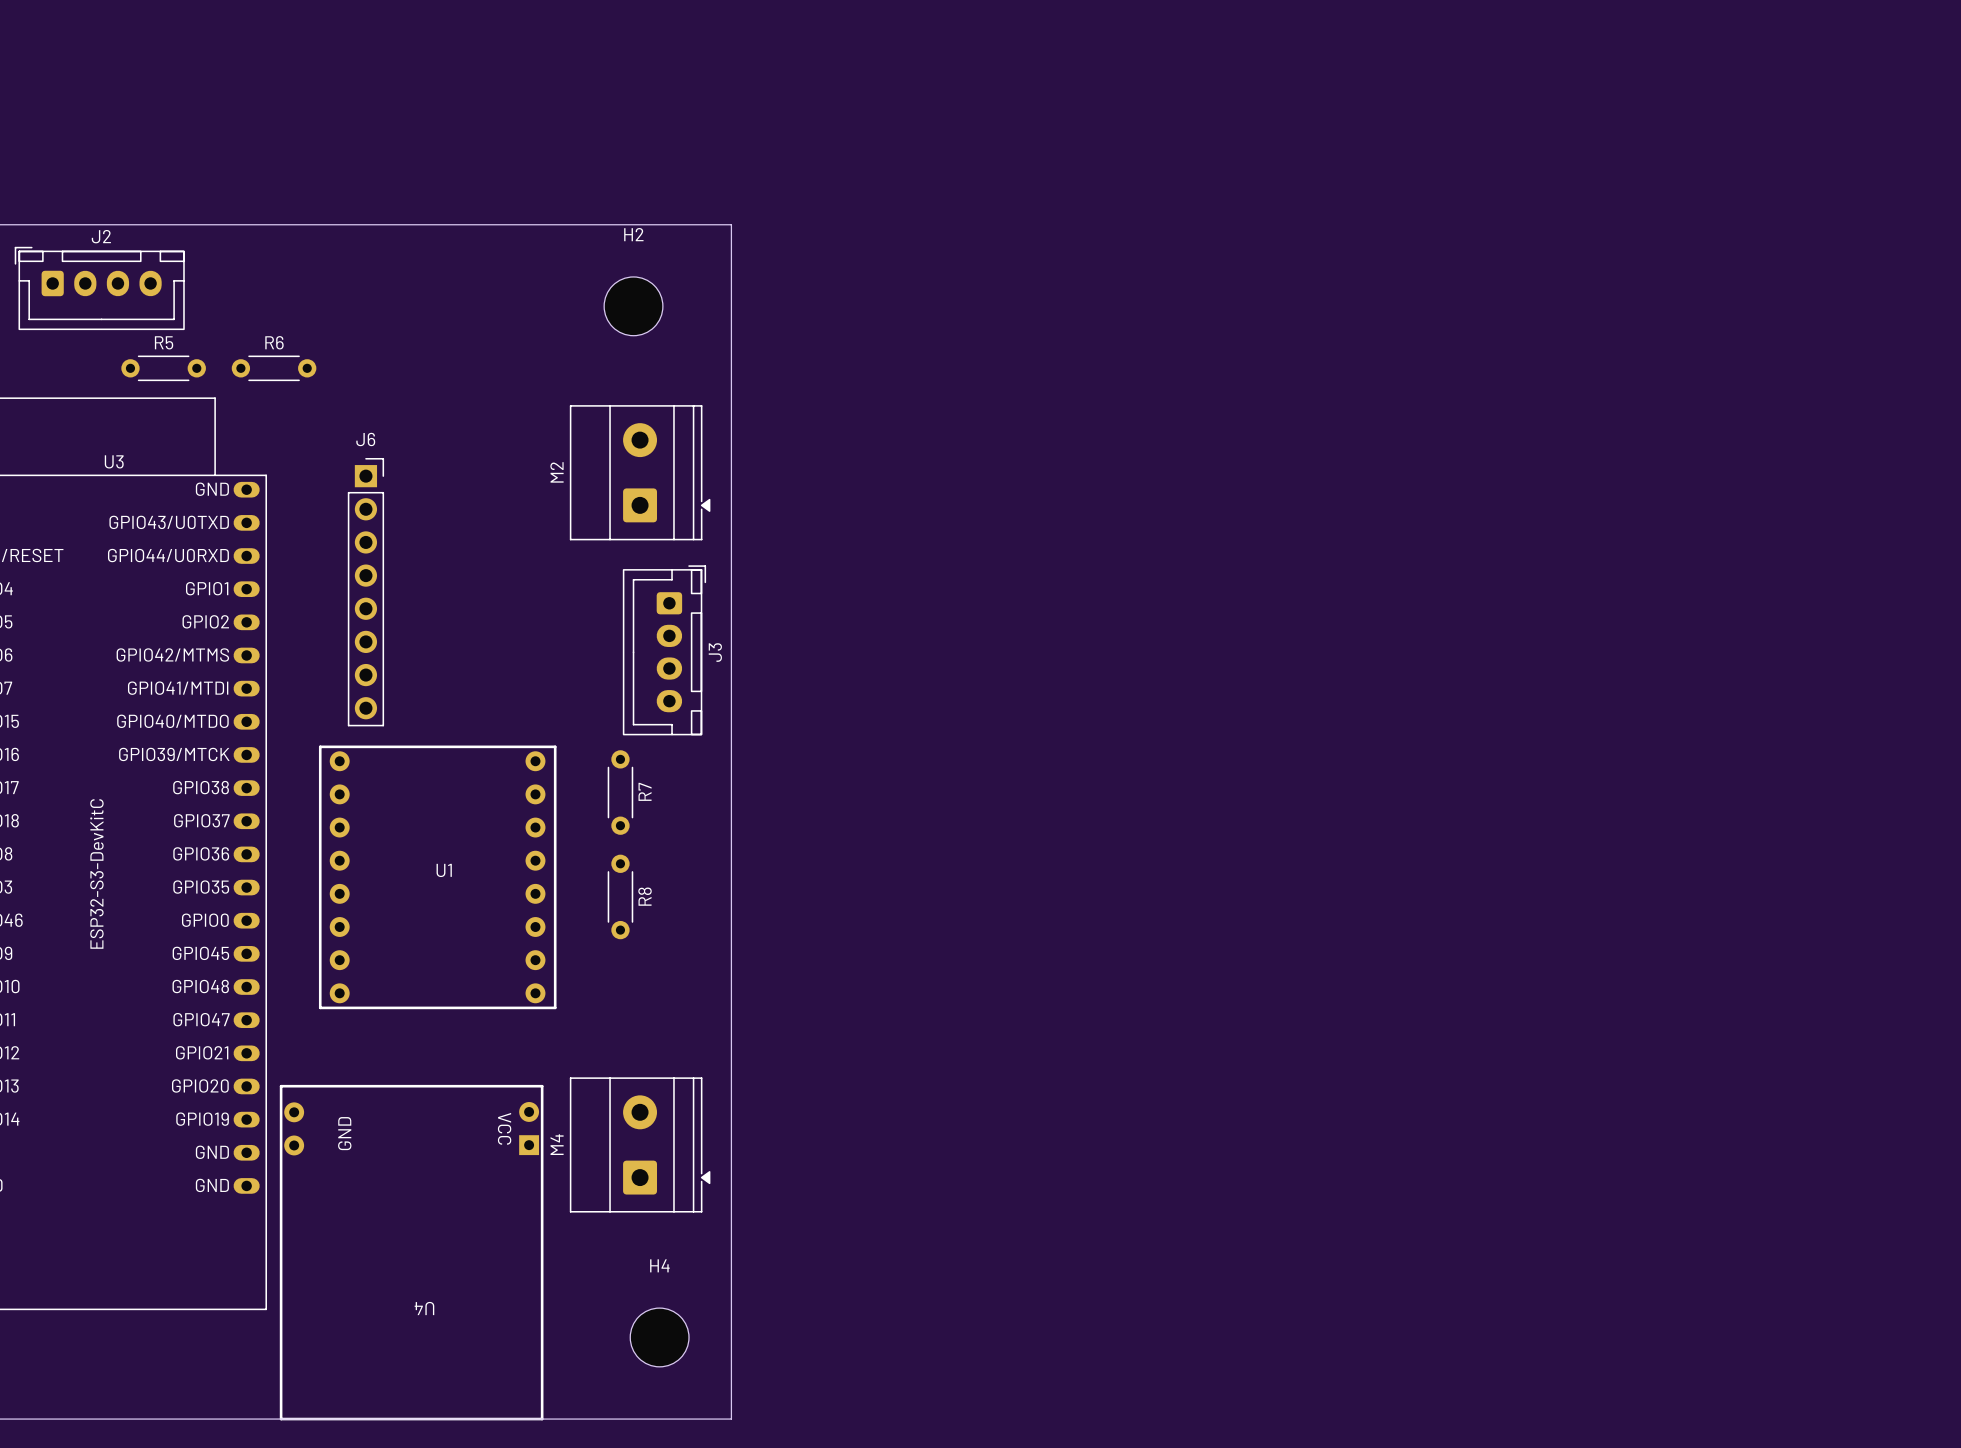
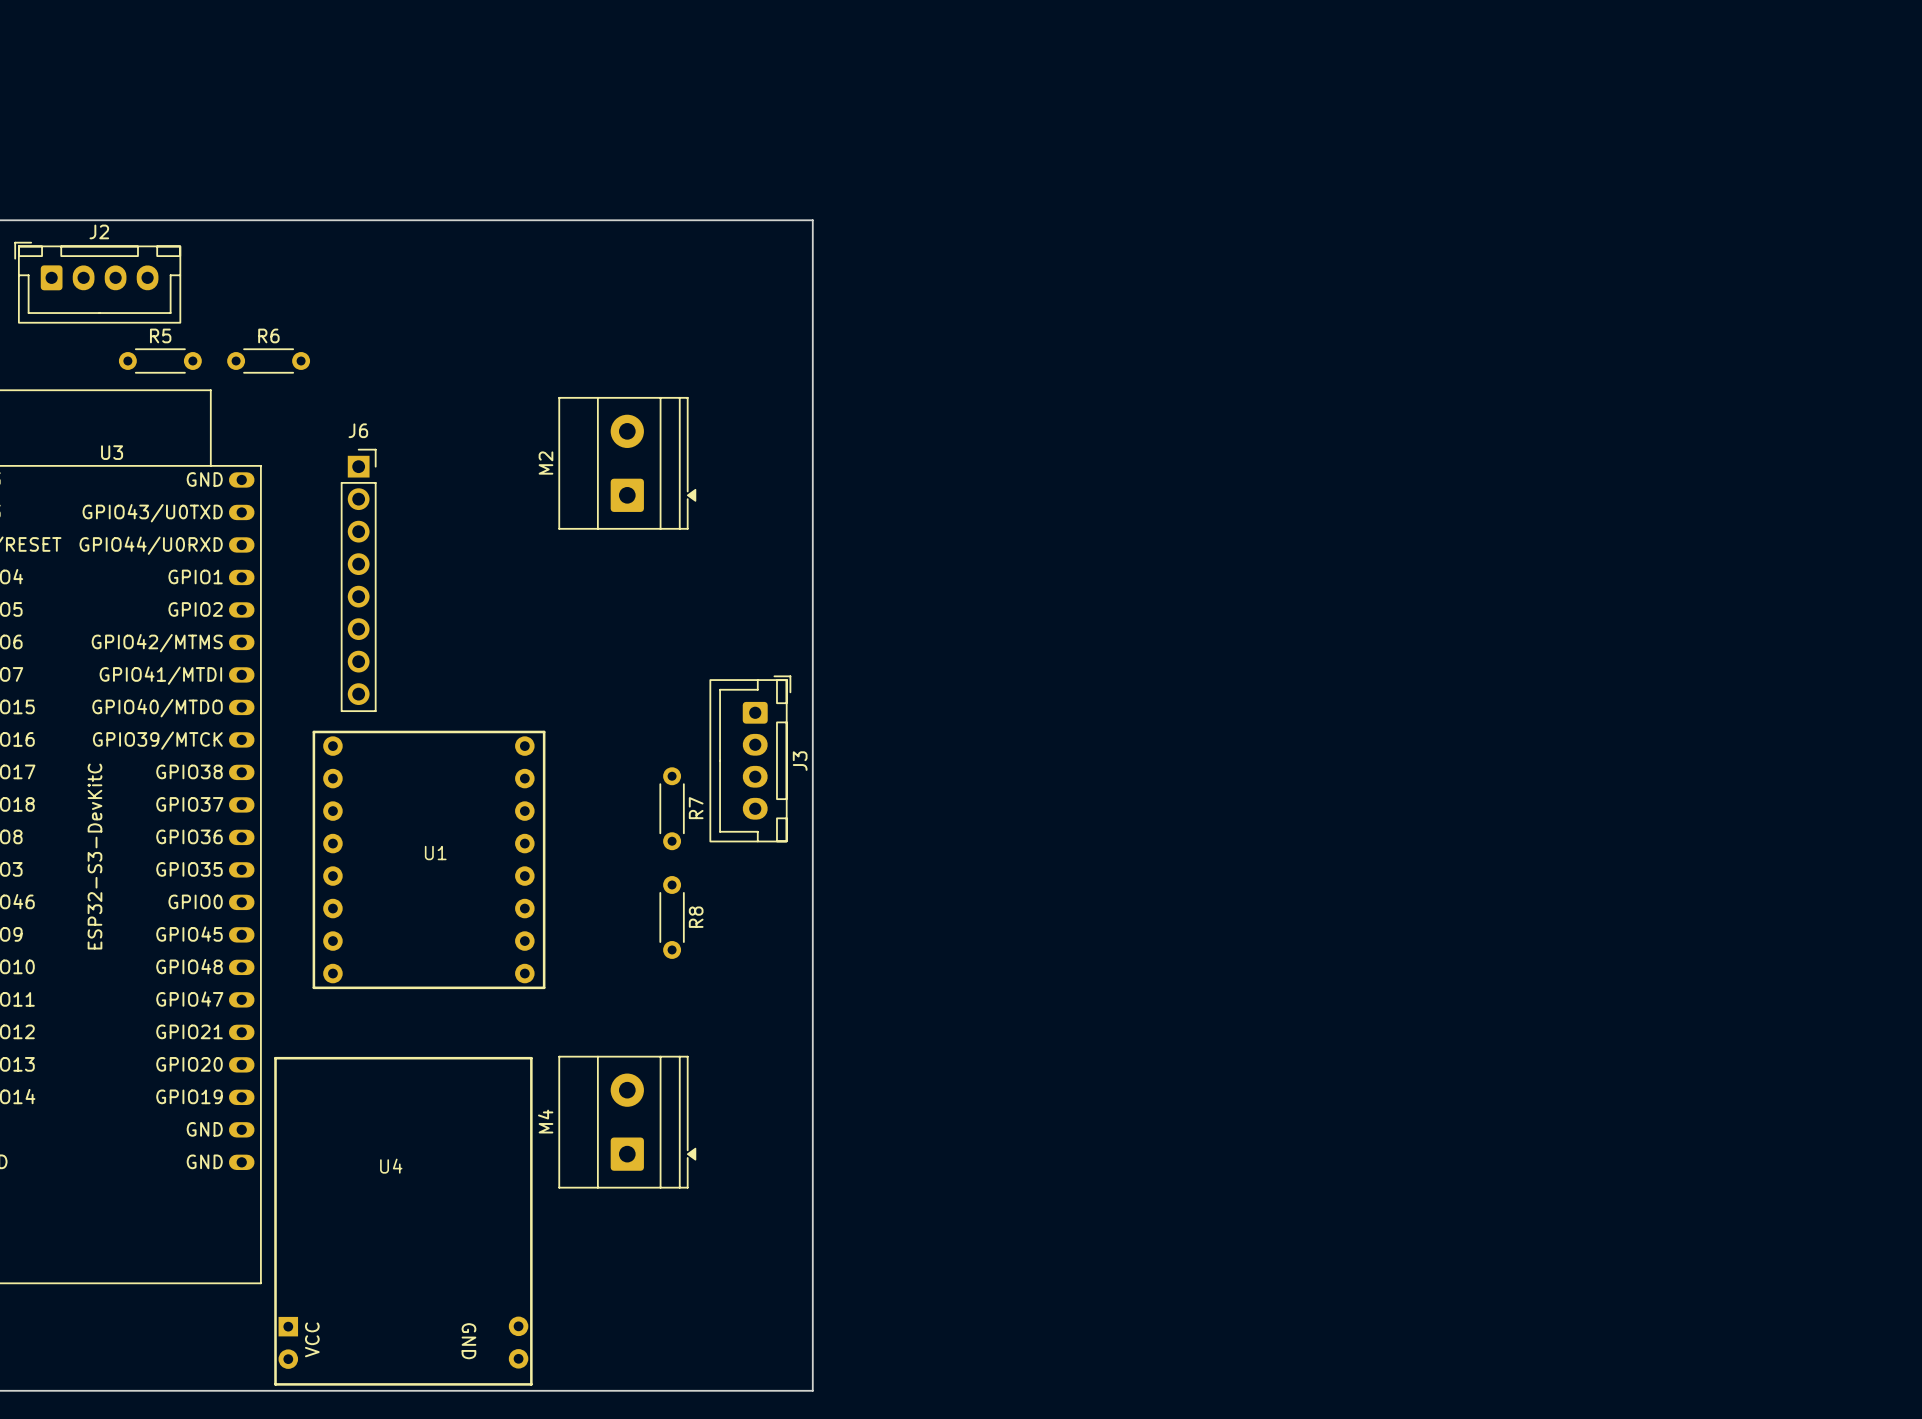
board edge: (731, 224) (731, 1419) -> (716, 220) (812, 220) (812, 1390) (716, 1390)
H2: (633, 306) -> none
J3 position: (664, 650) -> (750, 758)
R7 position: (620, 792) -> (672, 808)
R8 position: (620, 896) -> (672, 917)
U4 rotation: 0° (411, 1252) -> 180° (403, 1221)
H4: (659, 1337) -> none

